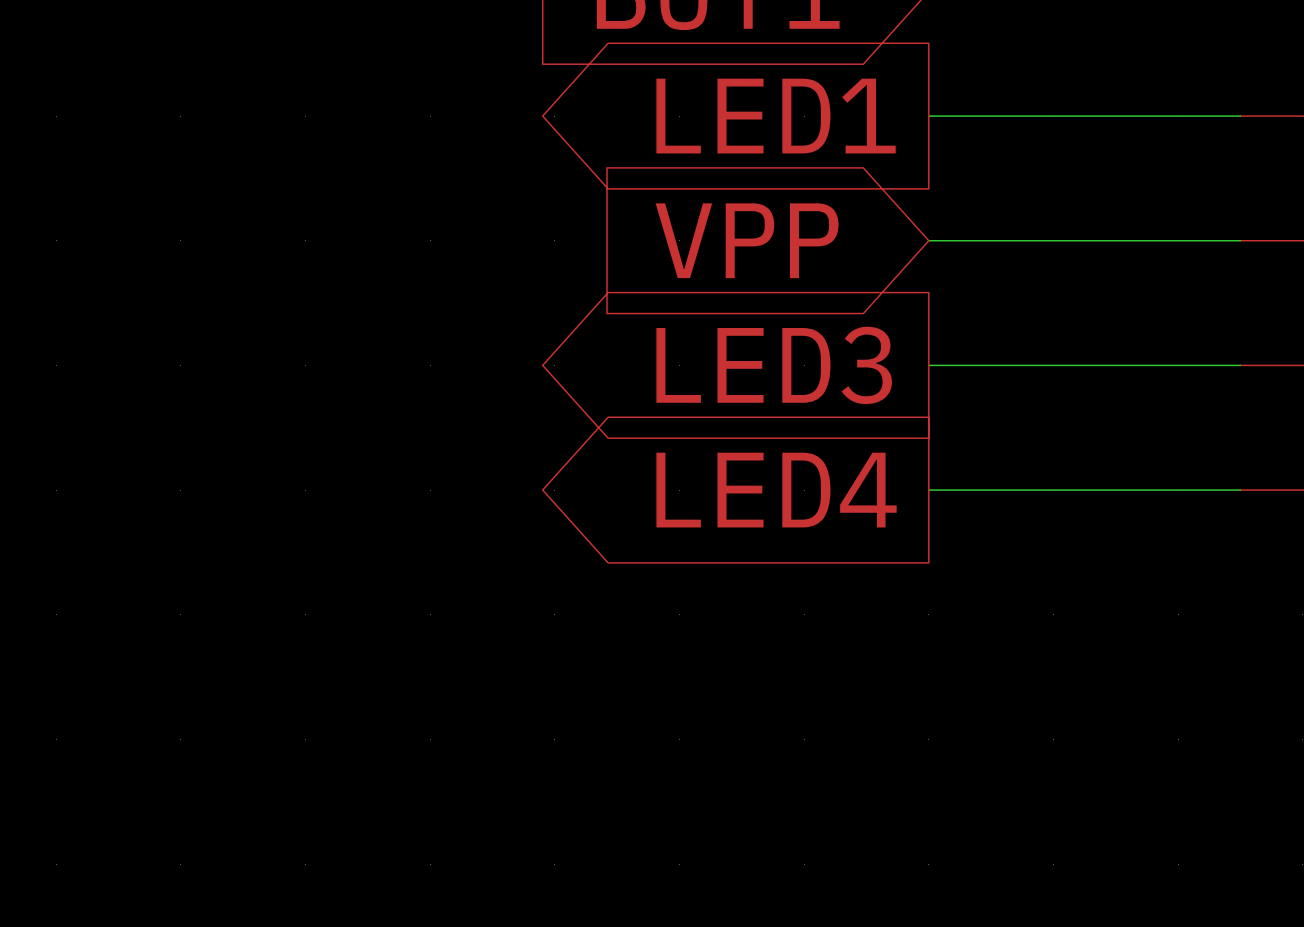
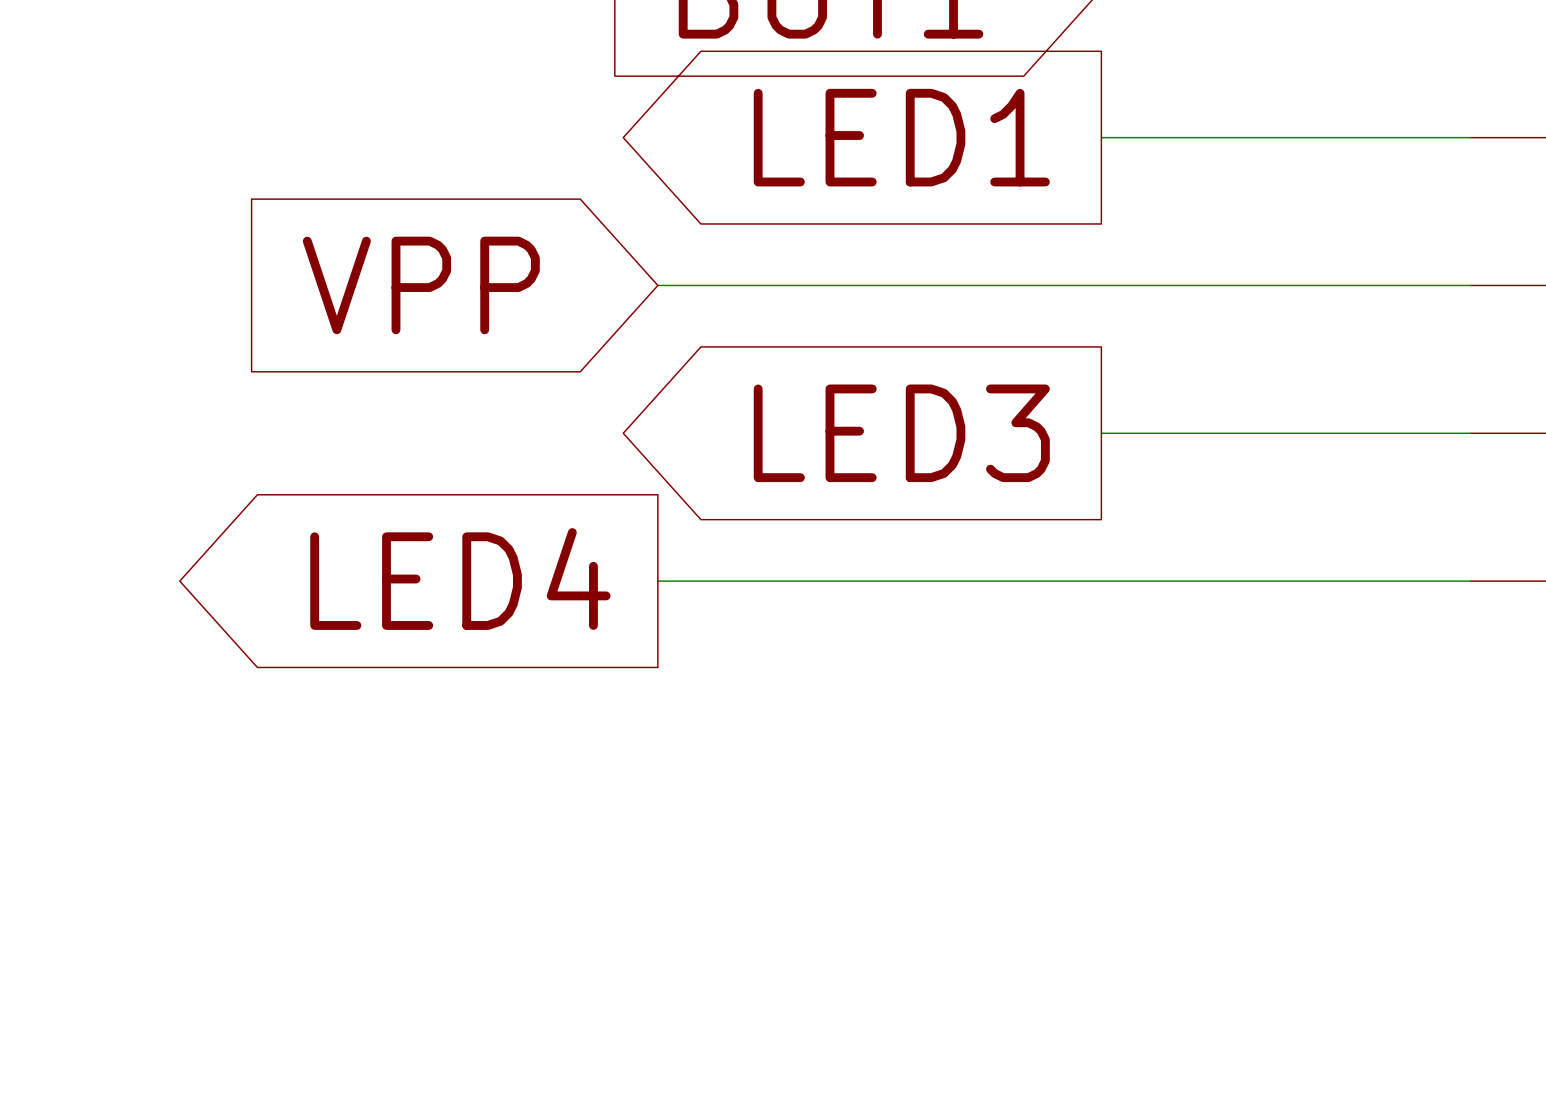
wire: none -> (657, 285) (1101, 285)
global label position: VPP (747, 240) -> VPP (421, 285)
wire: none -> (657, 581) (1101, 581)
global label position: LED4 (776, 490) -> LED4 (460, 579)

